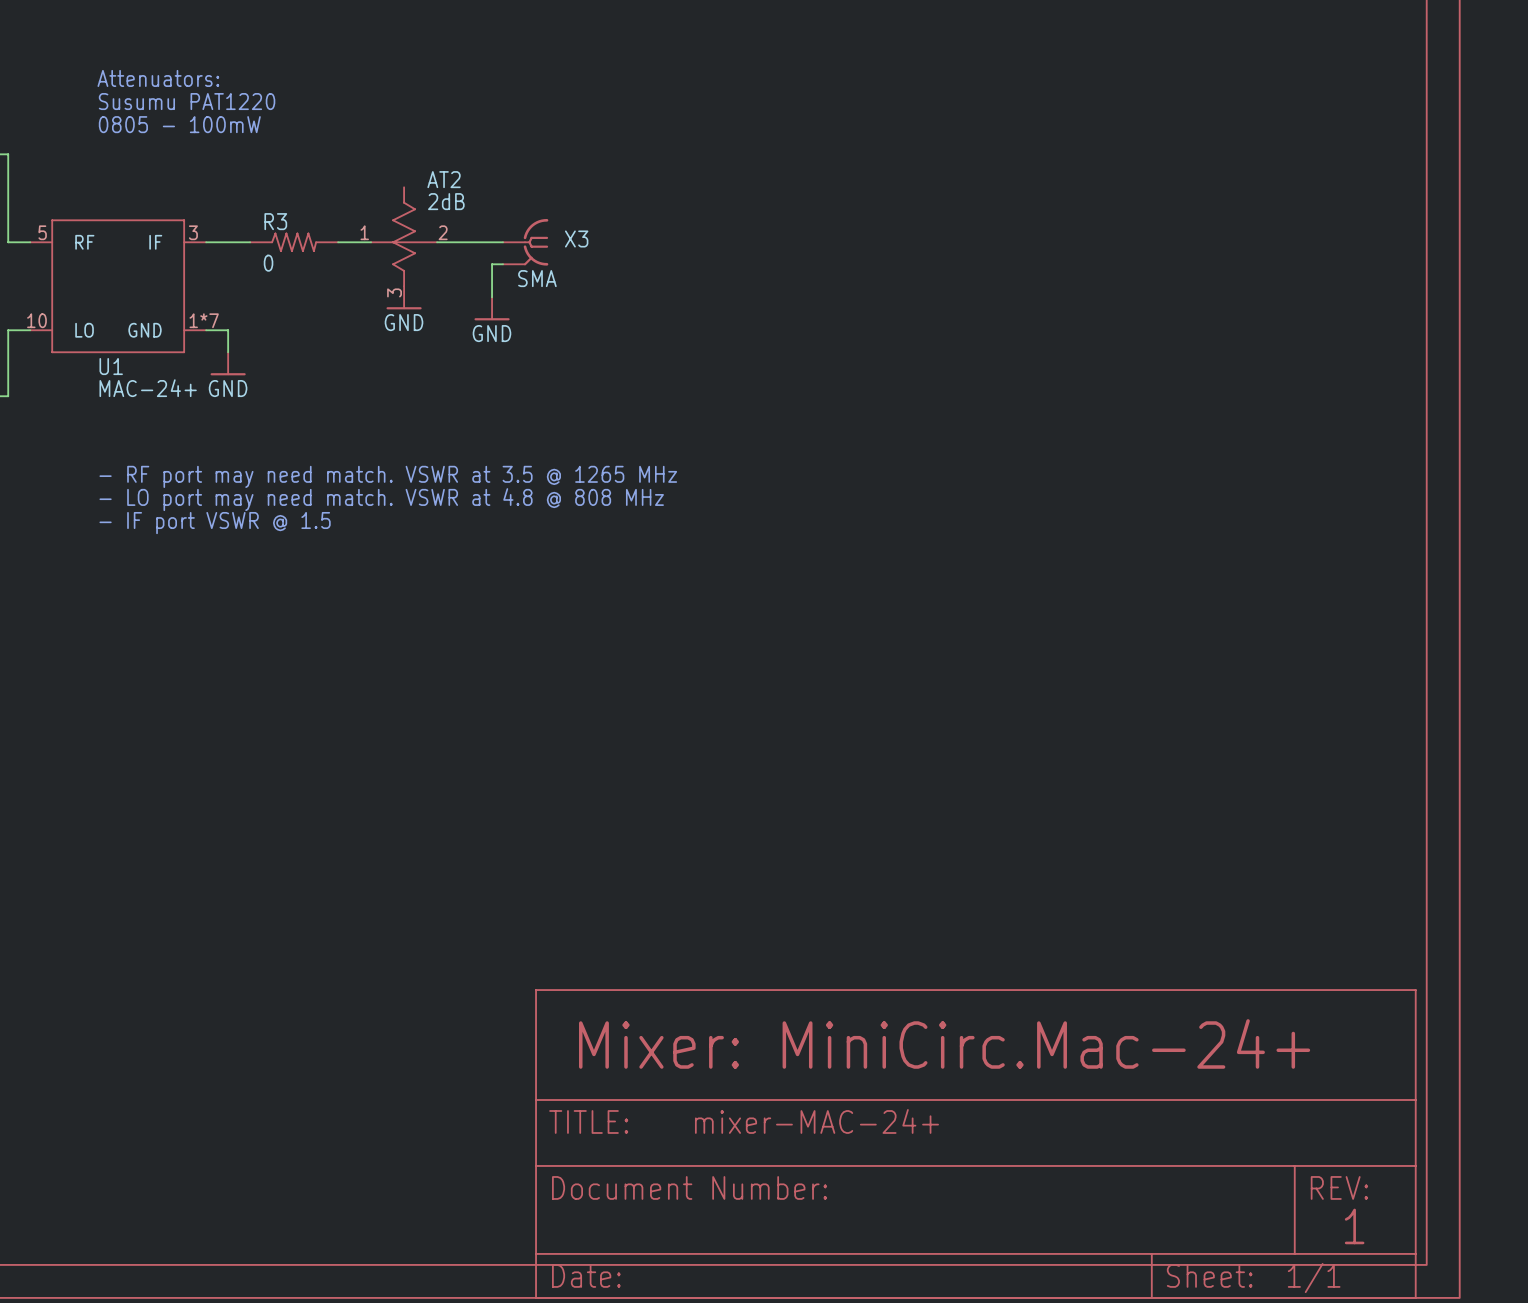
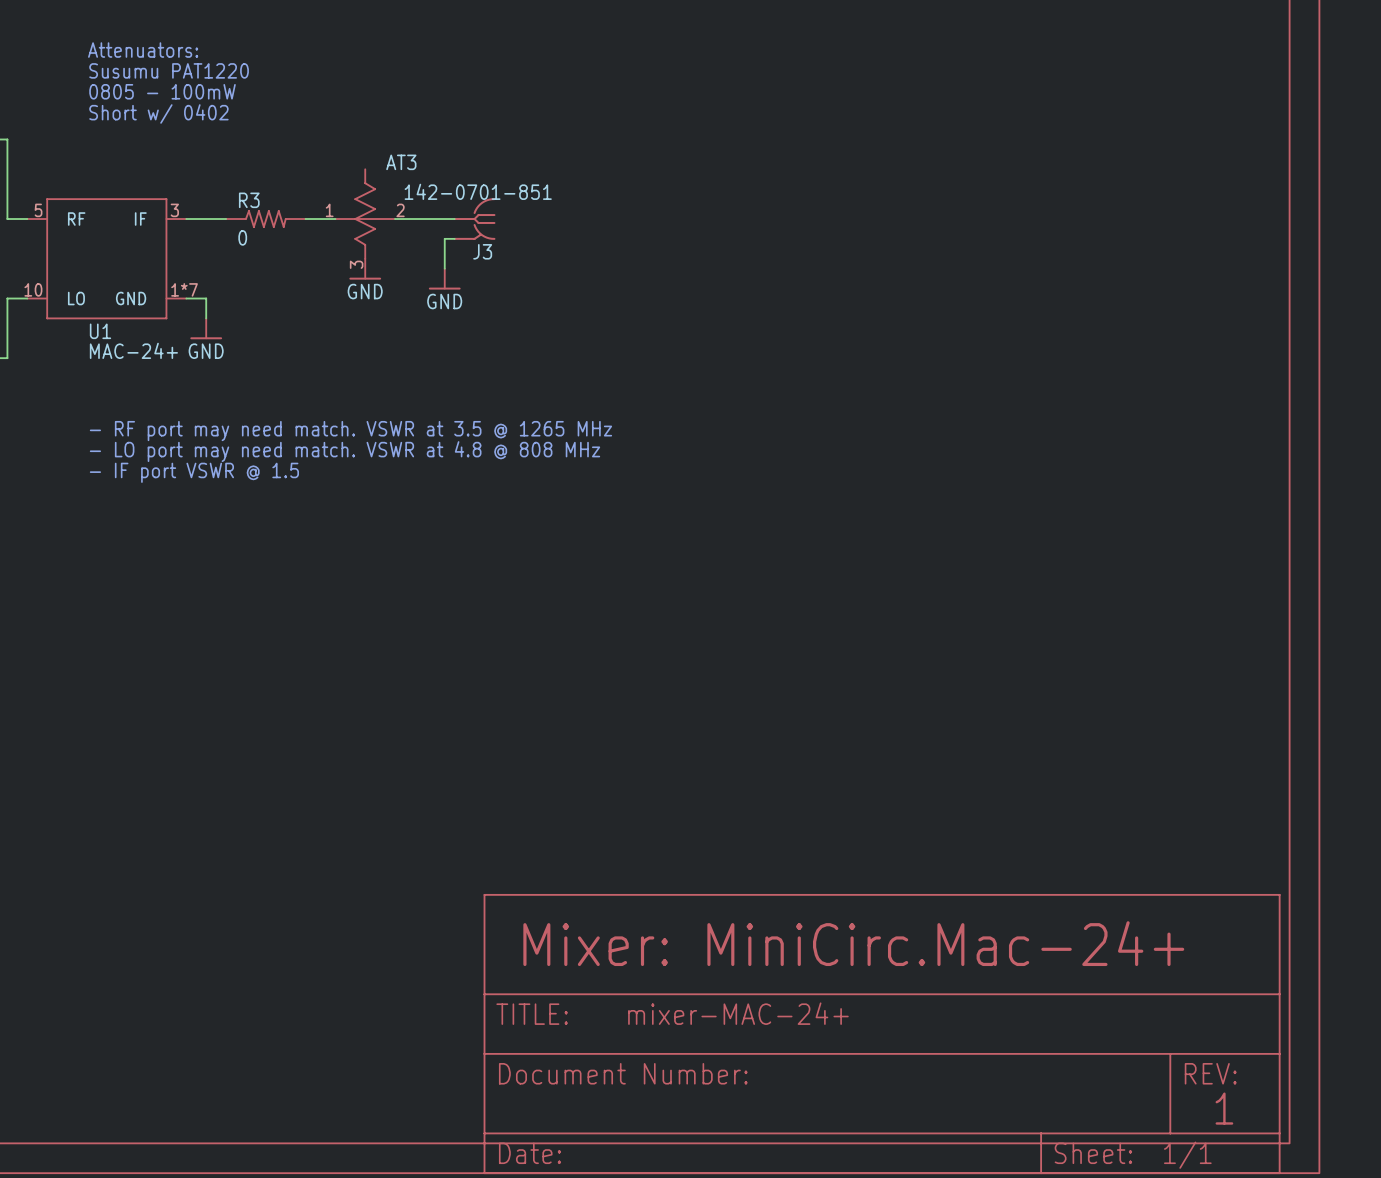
text: none -> Attenuators: (143, 50)
text: Attenuators: (158, 78) -> Susumu PAT1220 (169, 70)
text: Susumu PAT1220 (187, 101) -> 0805 - 100mW (162, 91)
text: 0805 - 100mW (179, 124) -> Short w/ 0402 (158, 113)
AT2 name: AT2 (444, 179) -> AT3 (401, 162)
AT2 value: 2dB (446, 201) -> none
X3: SMA (525, 242) -> none
J3: none -> 142-0701-851 (474, 219)

